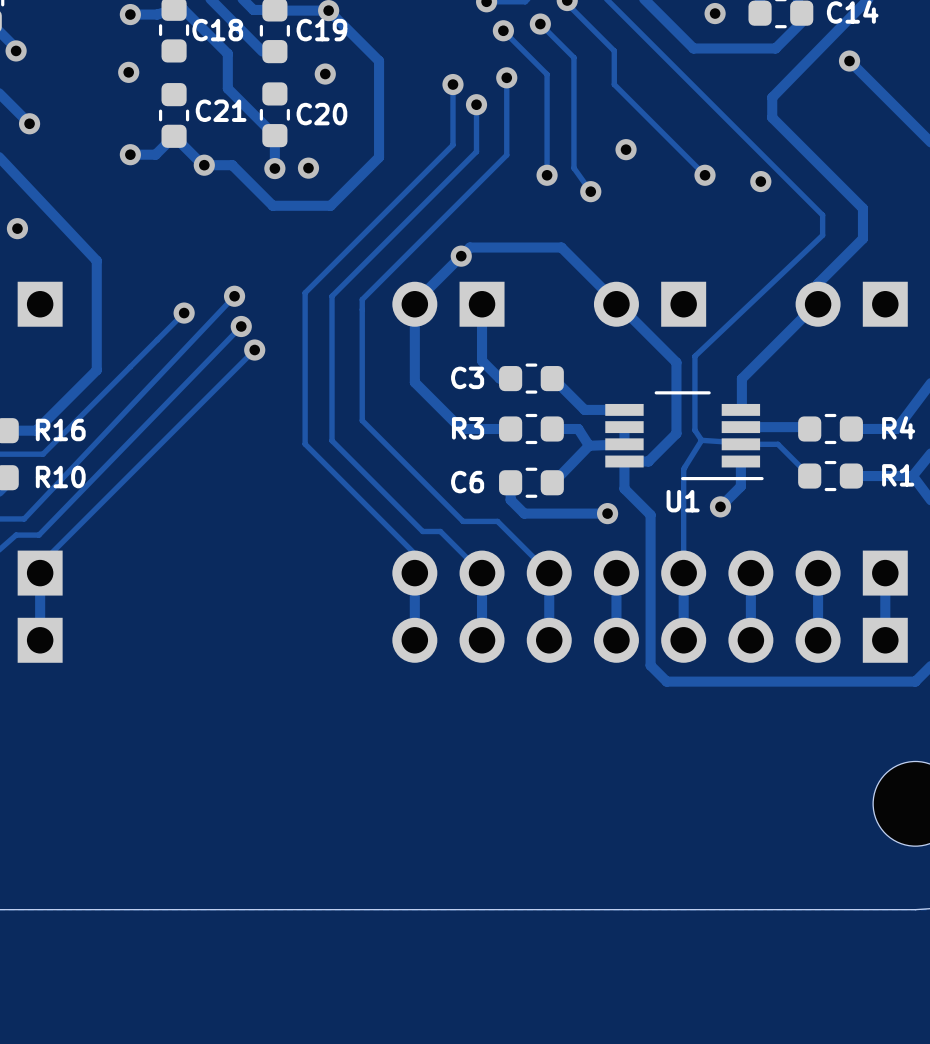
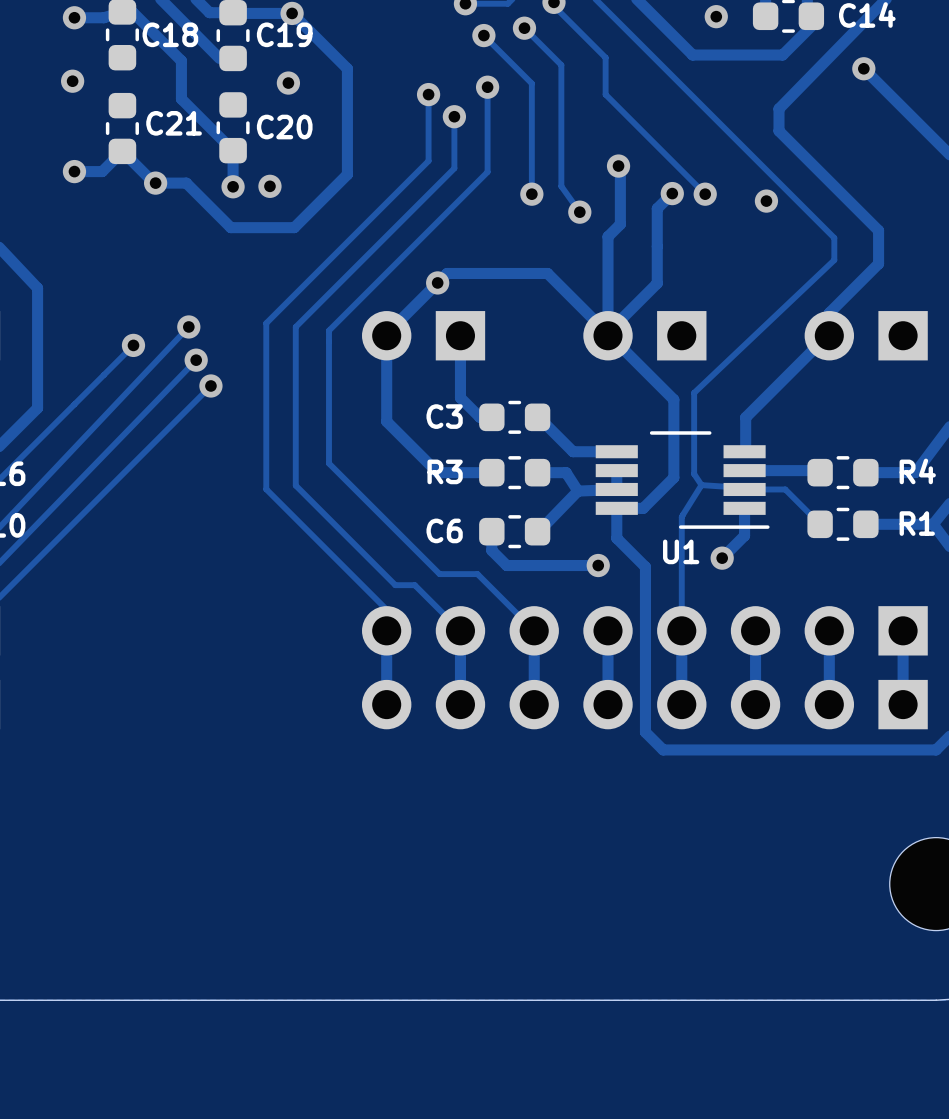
track: none -> (620, 165) (620, 224) (608, 236) (608, 335)
track: none -> (672, 193) (657, 208) (657, 283) (608, 332)
via: none -> (672, 193)

